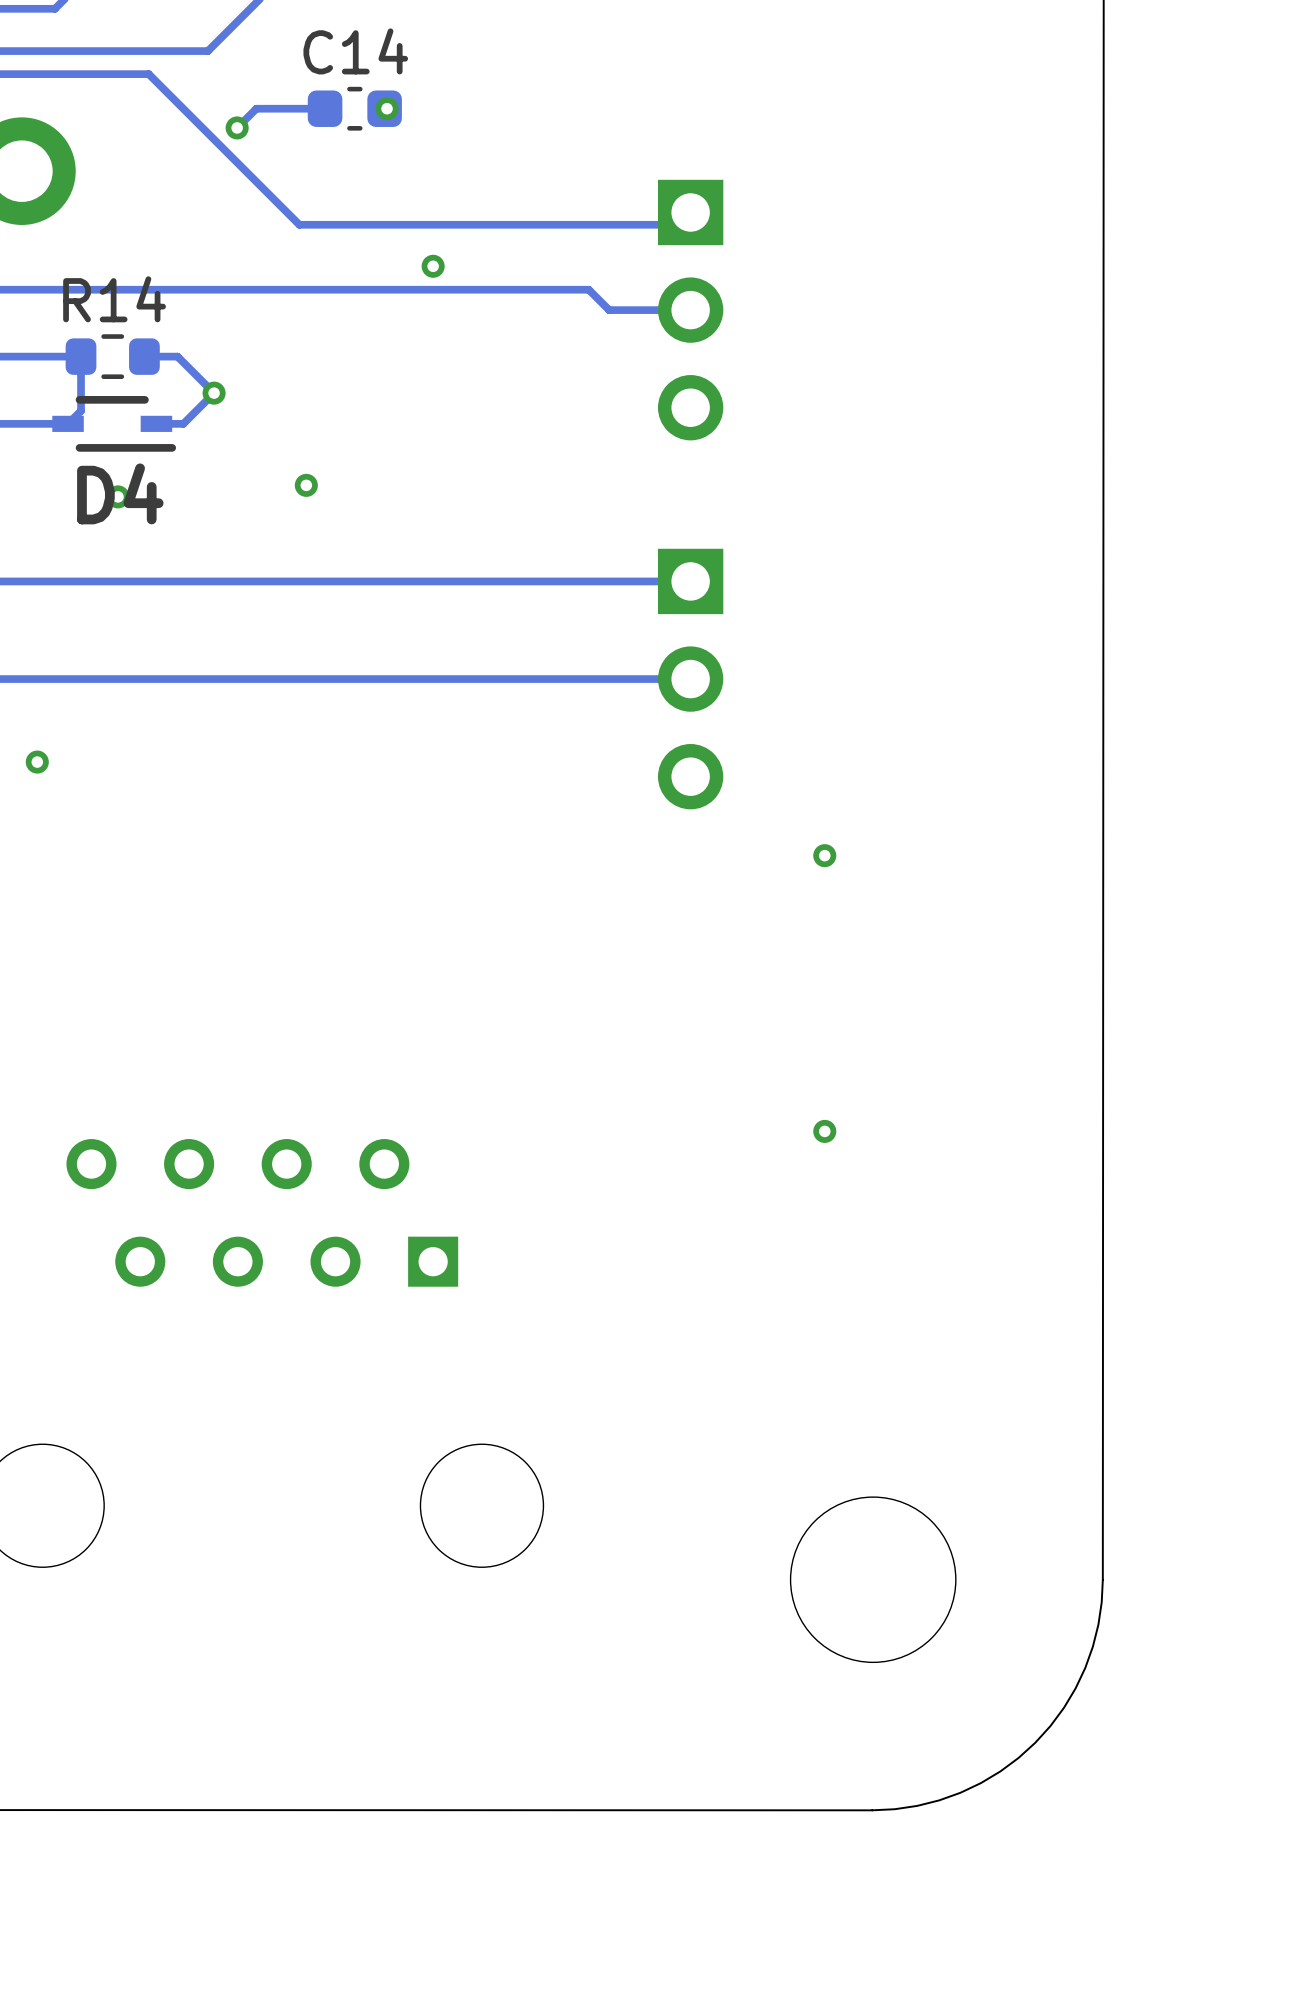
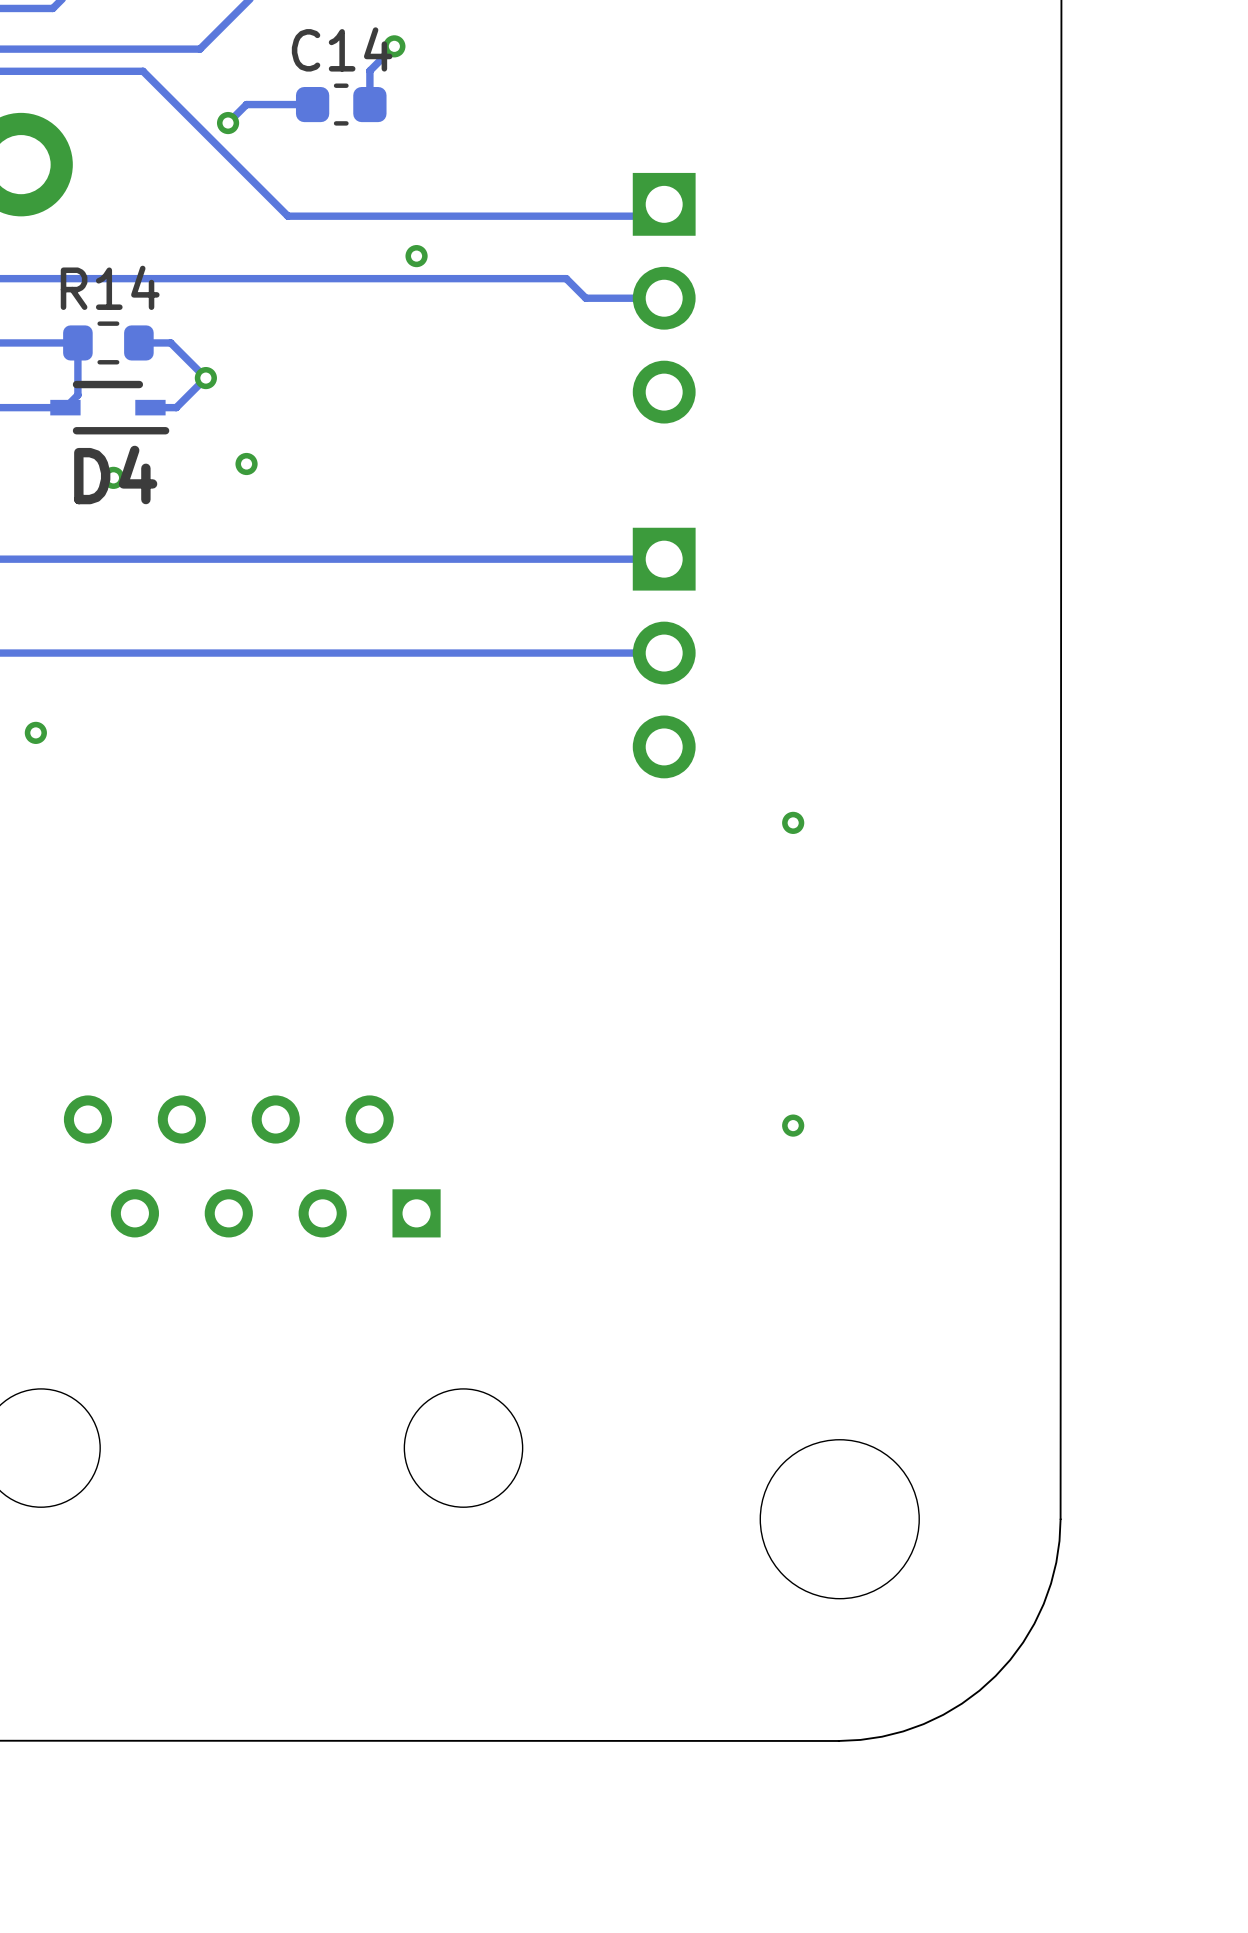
track: none -> (394, 46) (369, 70) (369, 104)
via position: (387, 108) -> (394, 46)
via position: (306, 485) -> (246, 464)
via position: (824, 1131) -> (793, 1125)

